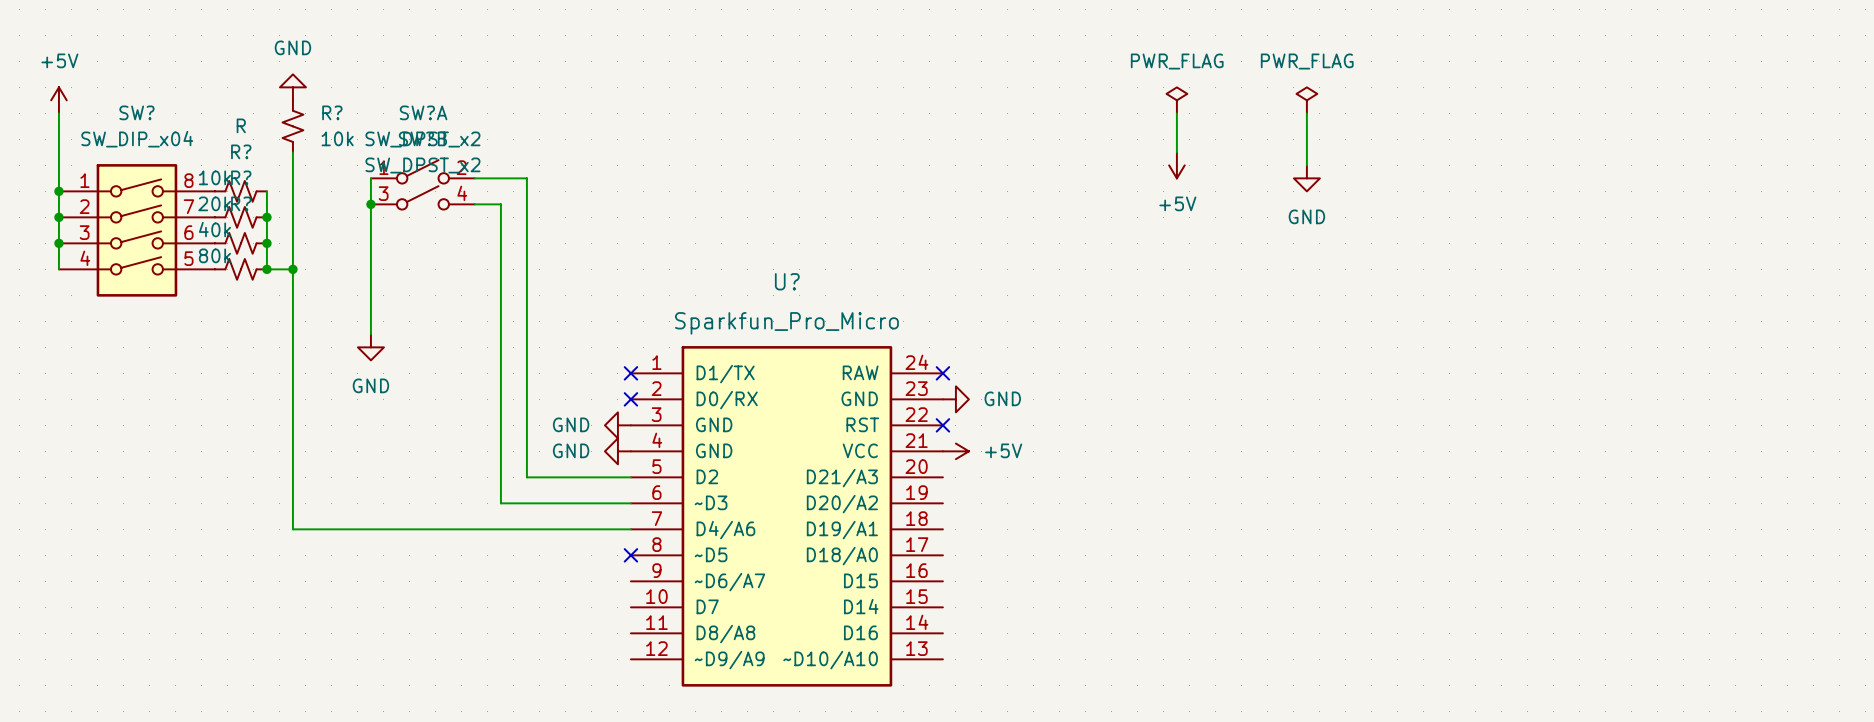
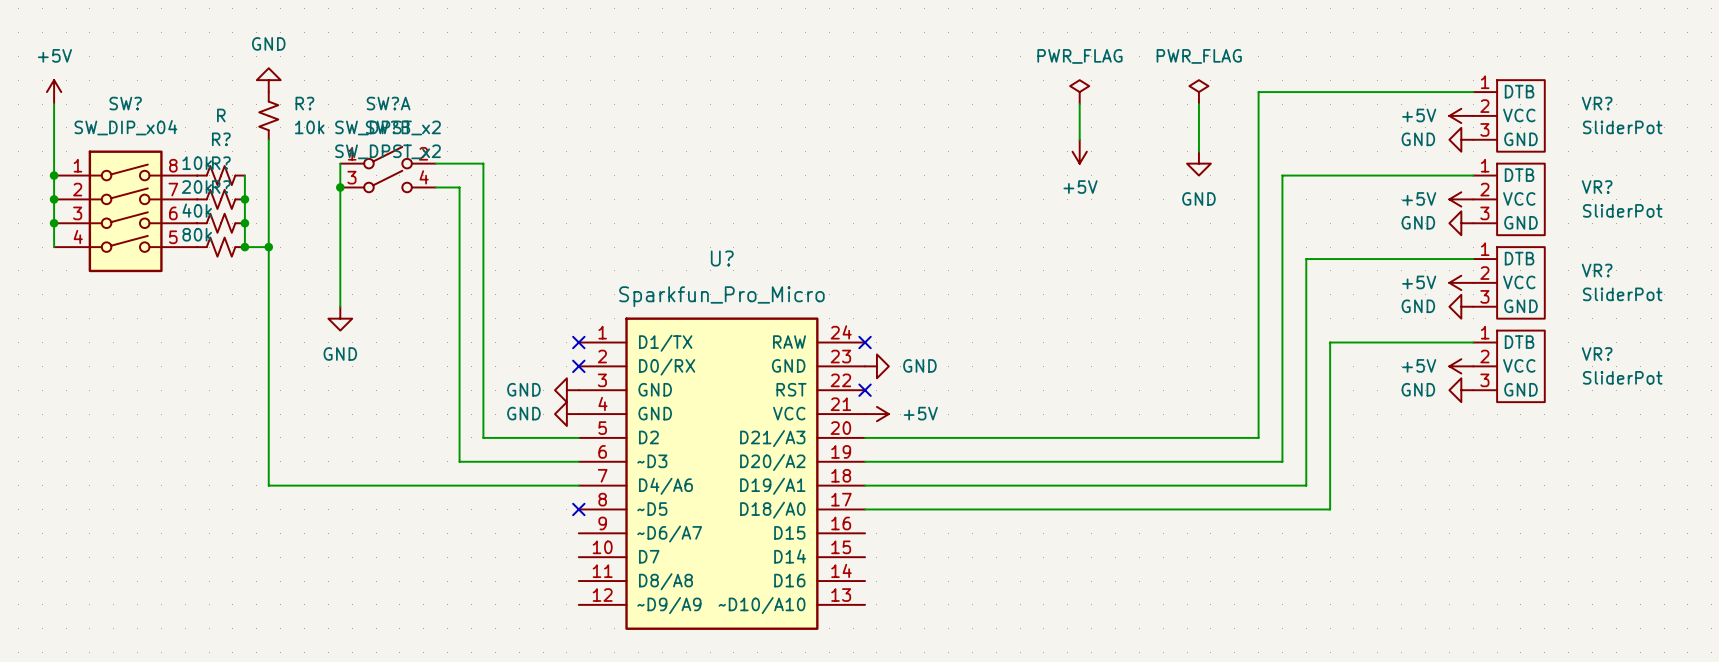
wire: none -> (1473, 92) (1258, 92) (1258, 437) (865, 437)
power symbol: none -> +5V (1461, 115)
VR?: none -> SliderPot (1520, 115)
power symbol: none -> GND (1461, 139)
wire: none -> (1473, 175) (1282, 175) (1282, 461) (865, 461)
power symbol: none -> +5V (1461, 199)
VR?: none -> SliderPot (1520, 199)
power symbol: none -> GND (1461, 223)
wire: none -> (1473, 259) (1306, 259) (1306, 485) (865, 485)
power symbol: none -> +5V (1461, 282)
VR?: none -> SliderPot (1520, 282)
power symbol: none -> GND (1461, 306)
wire: none -> (1473, 342) (1330, 342) (1330, 509) (865, 509)
power symbol: none -> +5V (1461, 366)
VR?: none -> SliderPot (1520, 366)
power symbol: none -> GND (1461, 390)

